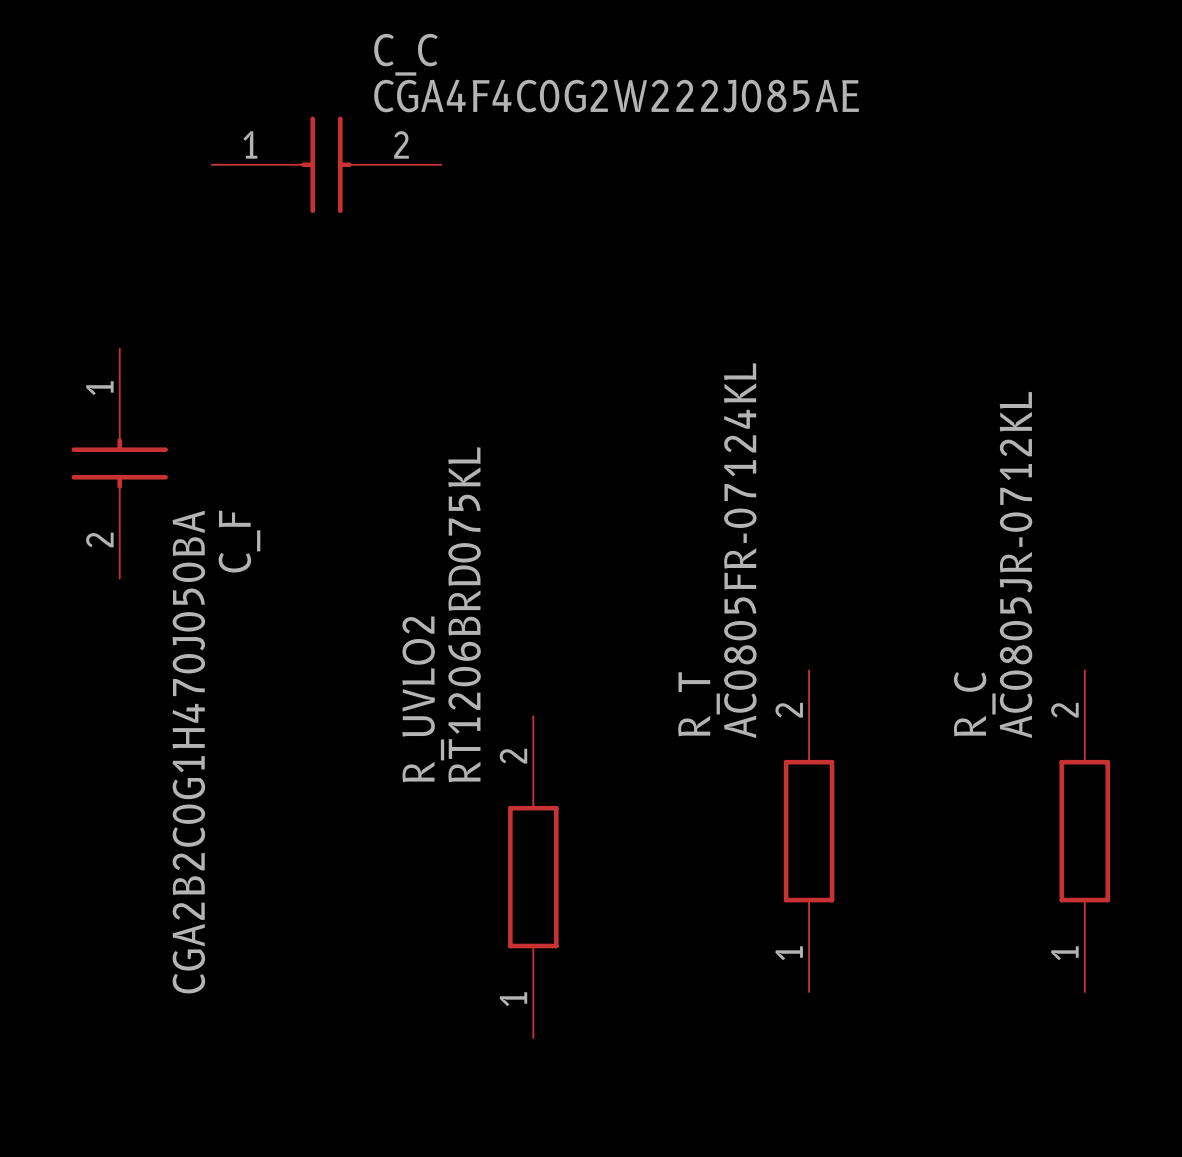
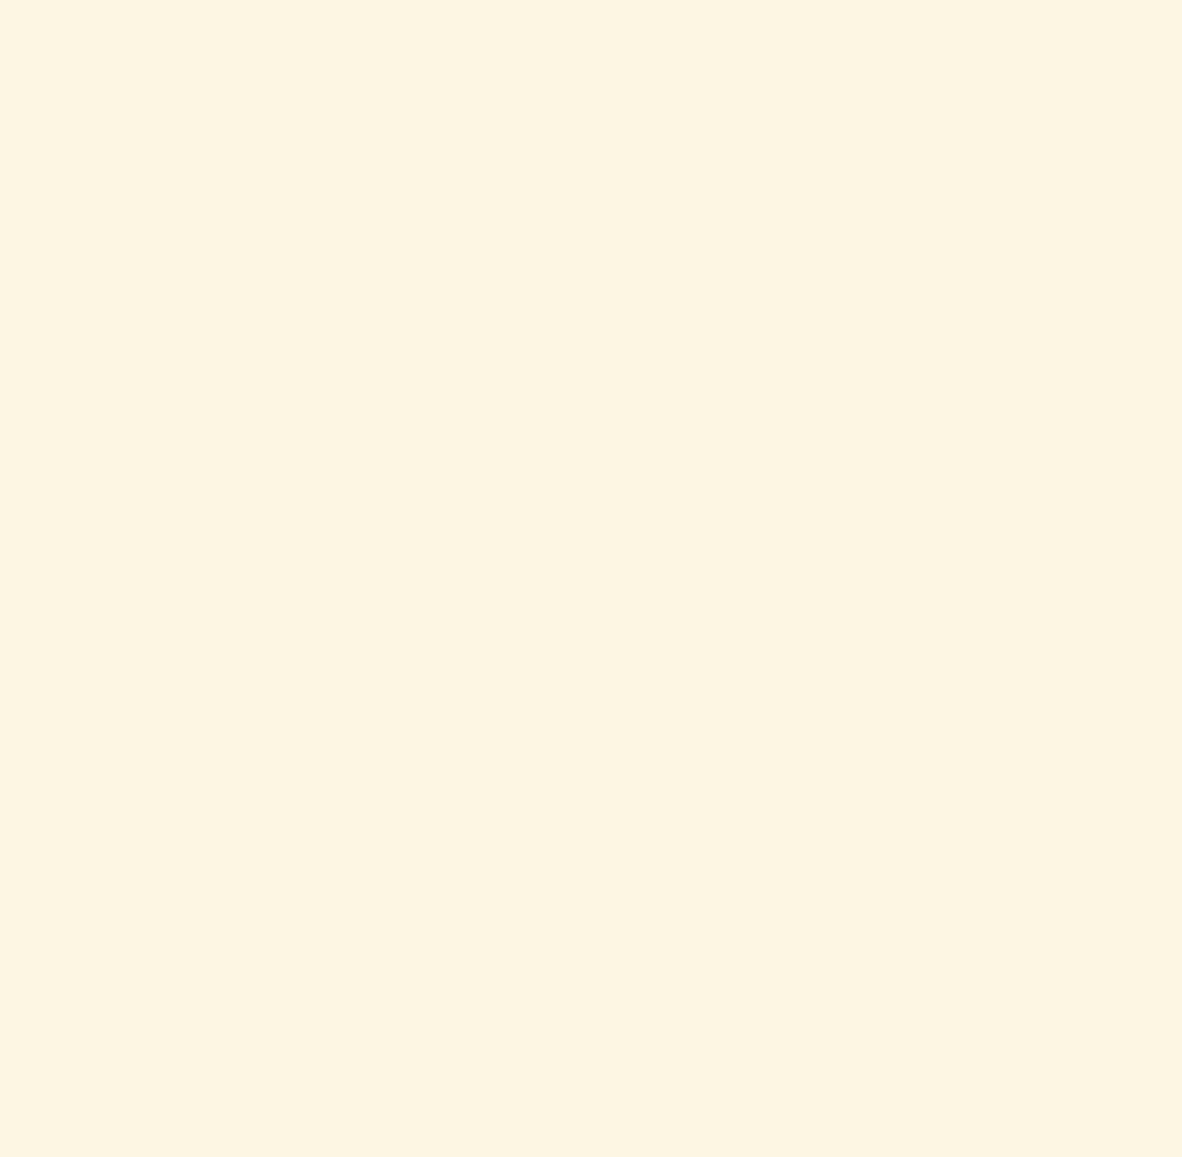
C_C: CGA4F4C0G2W222J085AE (326, 164) -> none
C_F: CGA2B2C0G1H470J050BA (119, 463) -> none
R_T: AC0805FR-07124KL (809, 831) -> none
R_C: AC0805JR-0712KL (1084, 831) -> none
R_UVLO2: RT1206BRD075KL (533, 877) -> none

